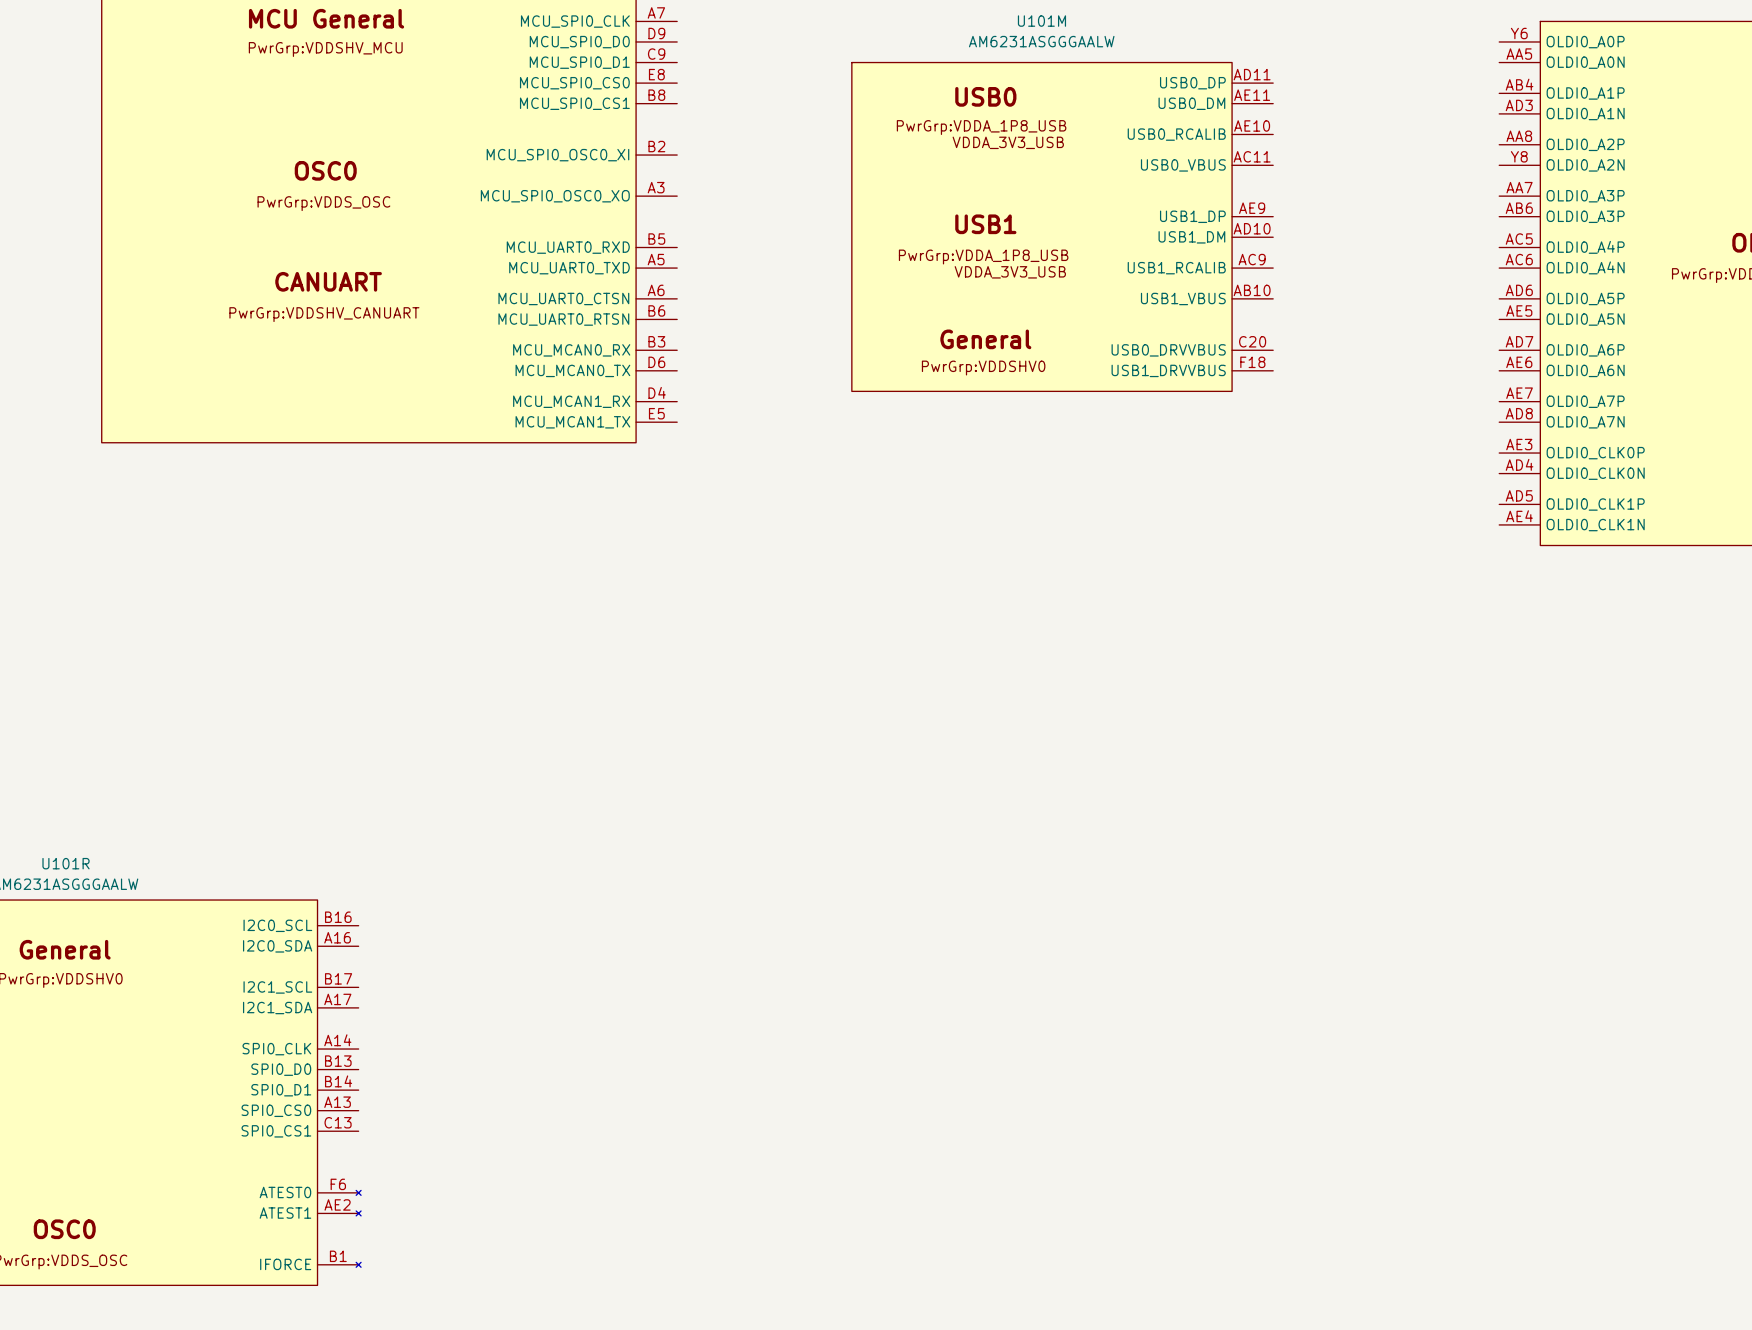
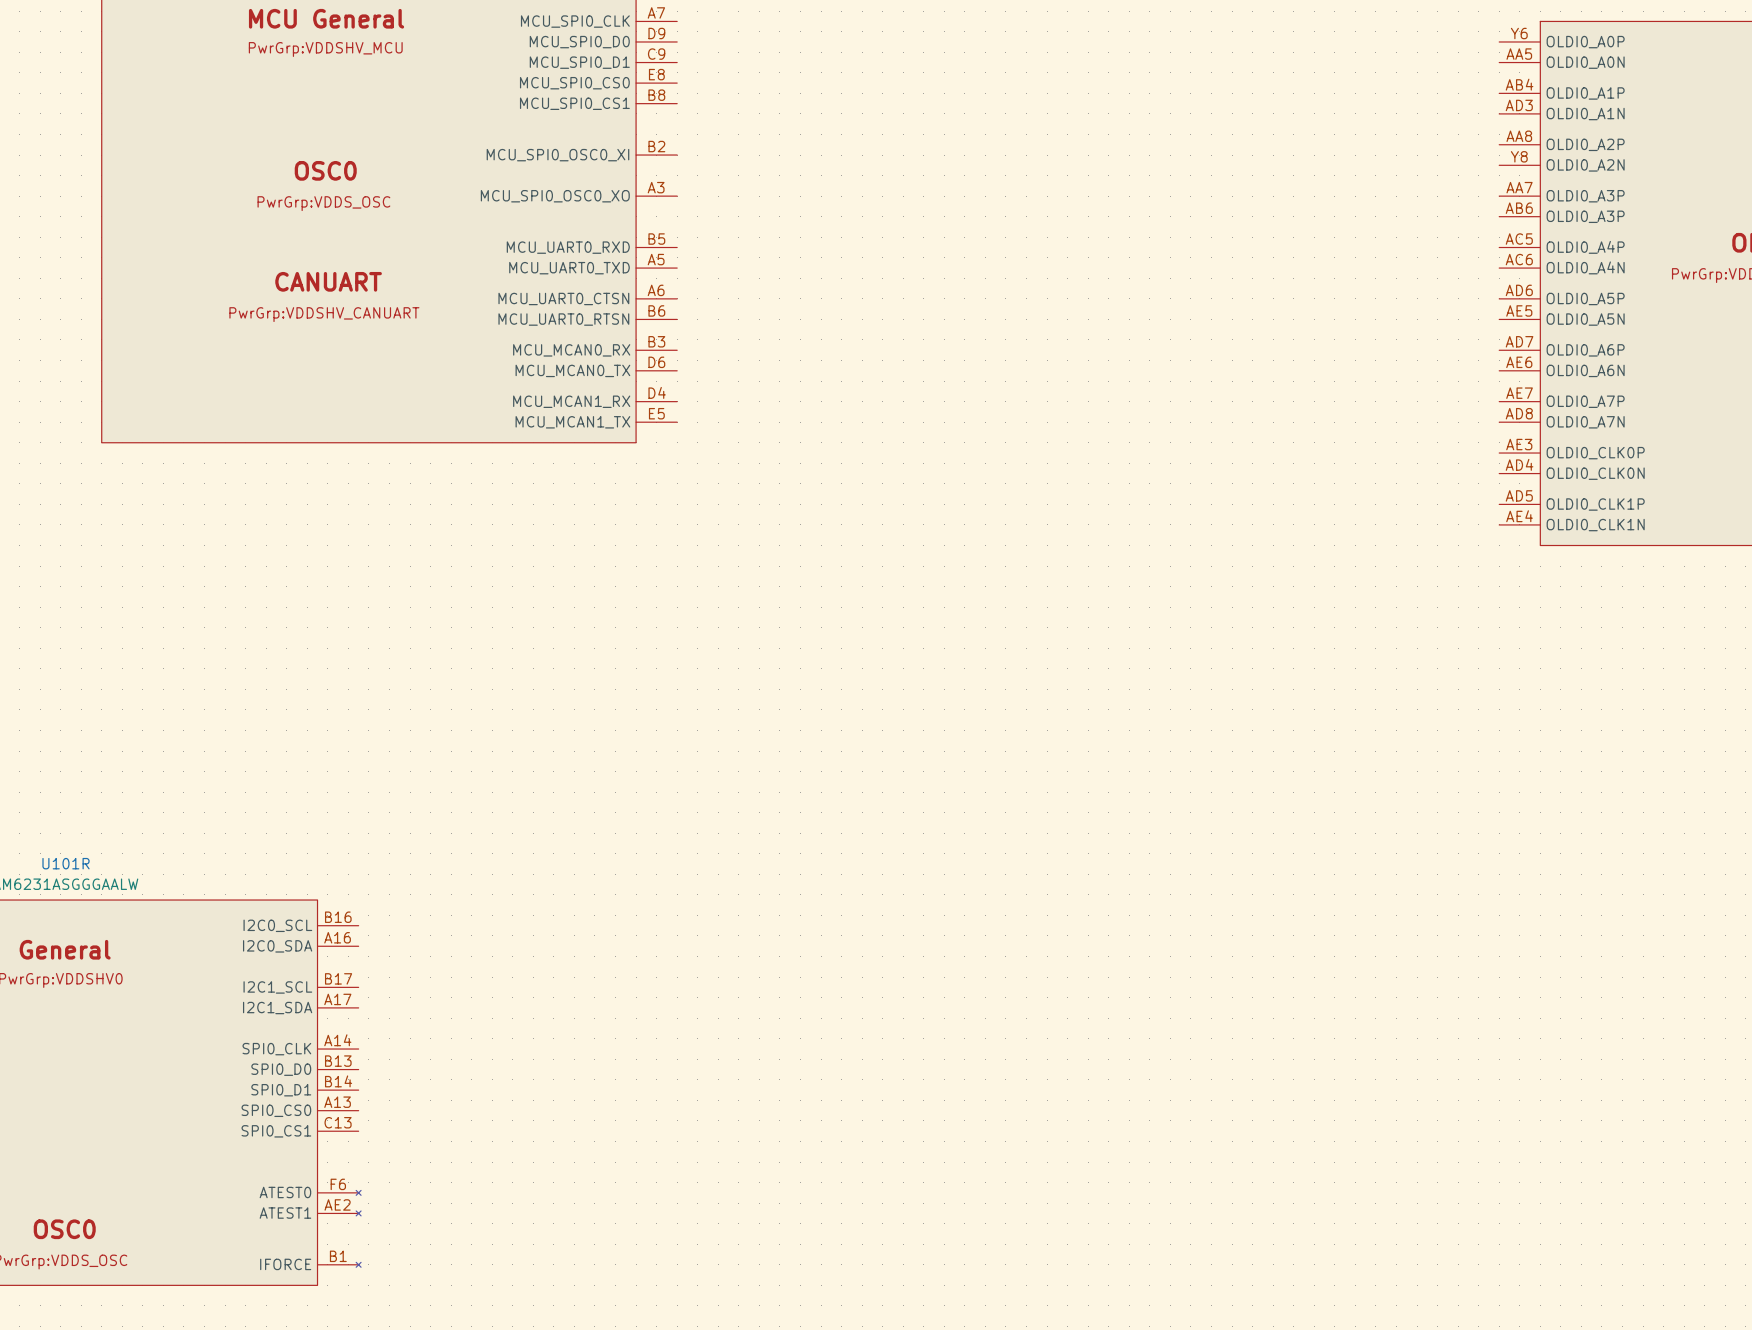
U101M: AM6231ASGGGAALW (1062, 226) -> none

